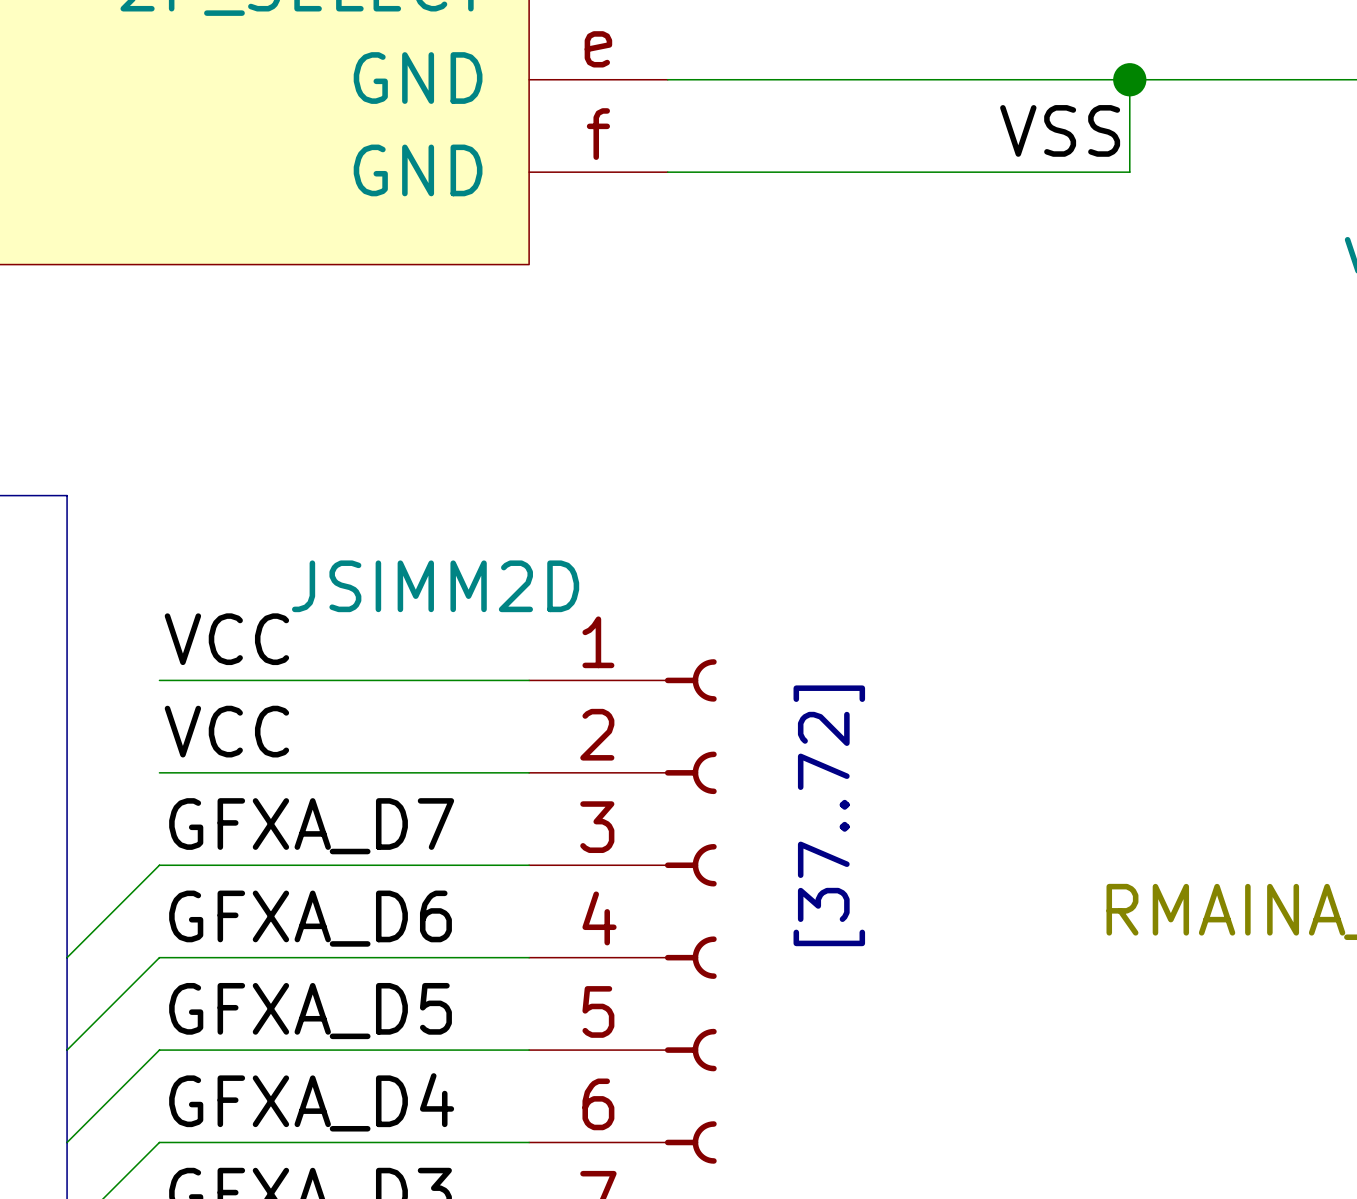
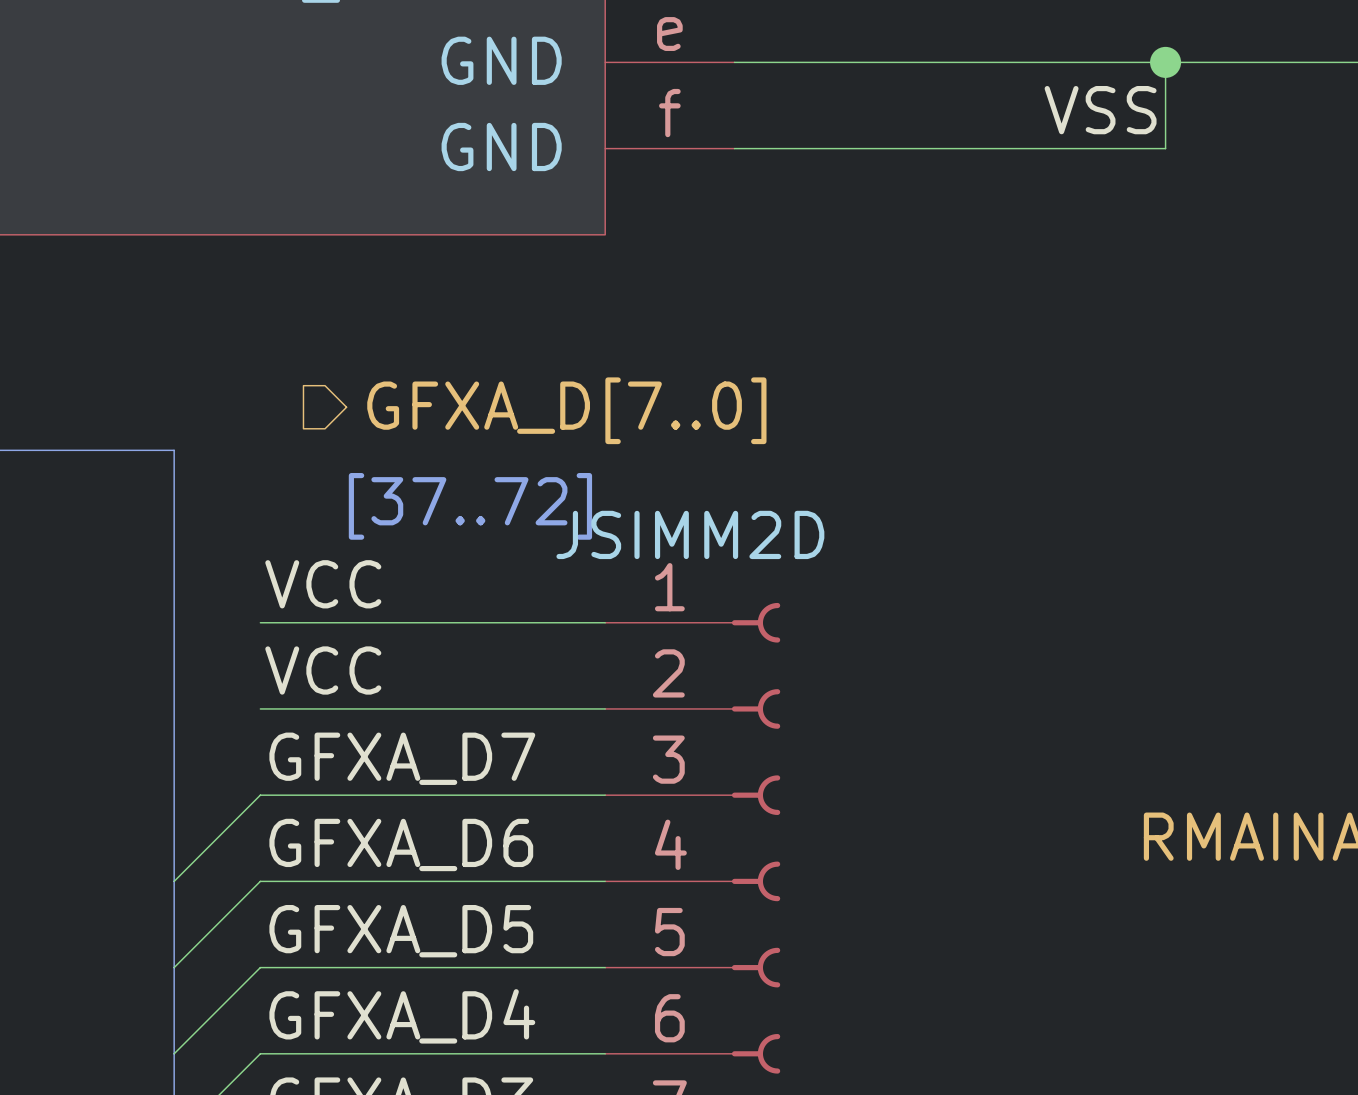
hierarchical label: none -> GFXA_D[7..0] (566, 410)
JSIMM2D name position: JSIMM2D (435, 586) -> JSIMM2D (690, 534)
text rotation: 0° (829, 815) -> 90° clockwise (470, 506)
text position: [37..72] (829, 815) -> [37..72] (470, 506)

